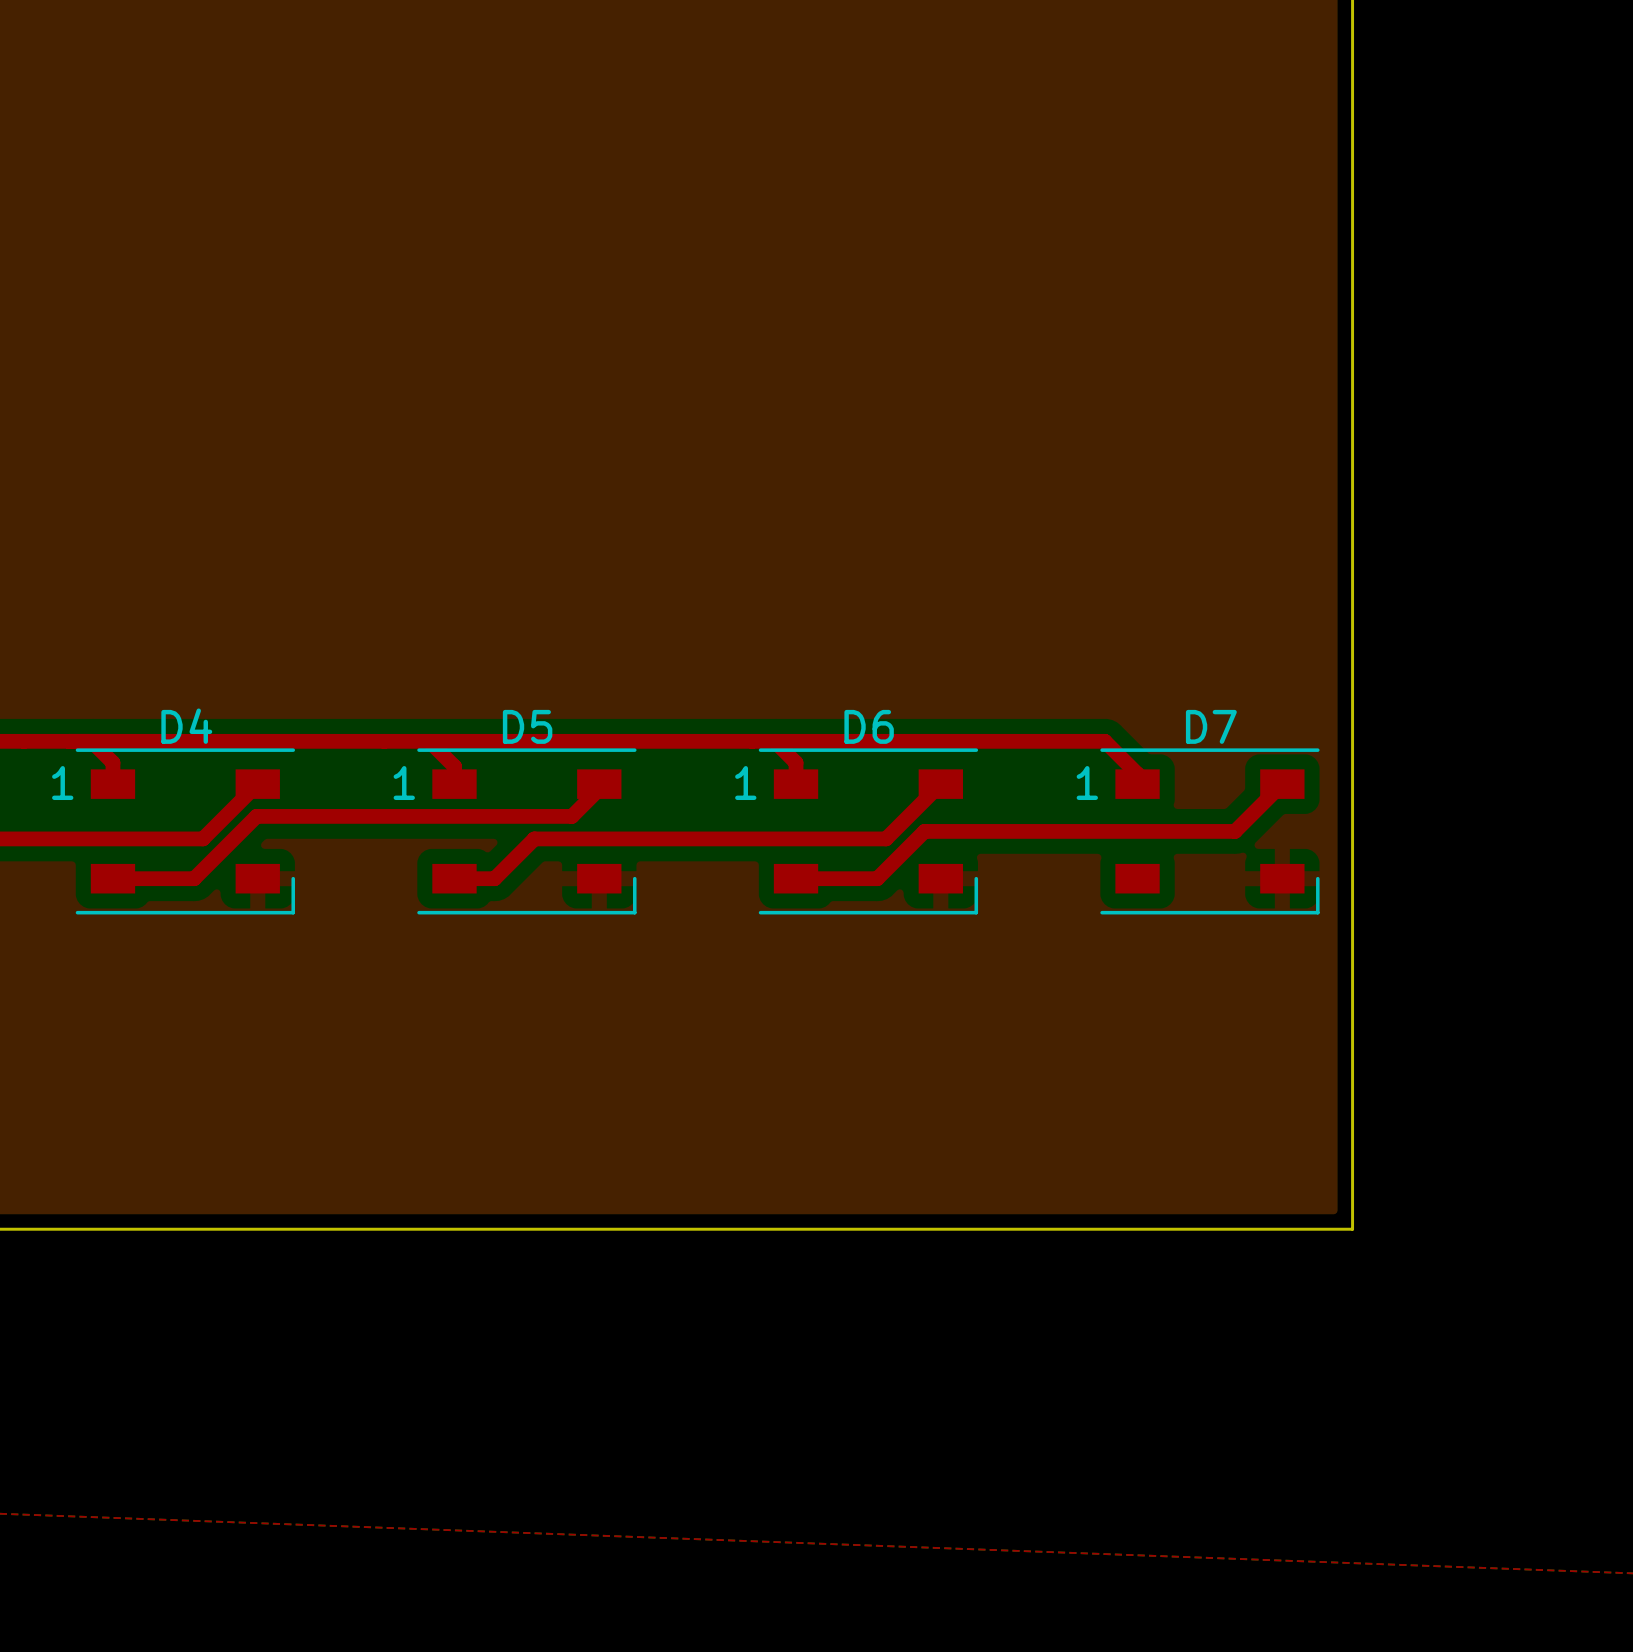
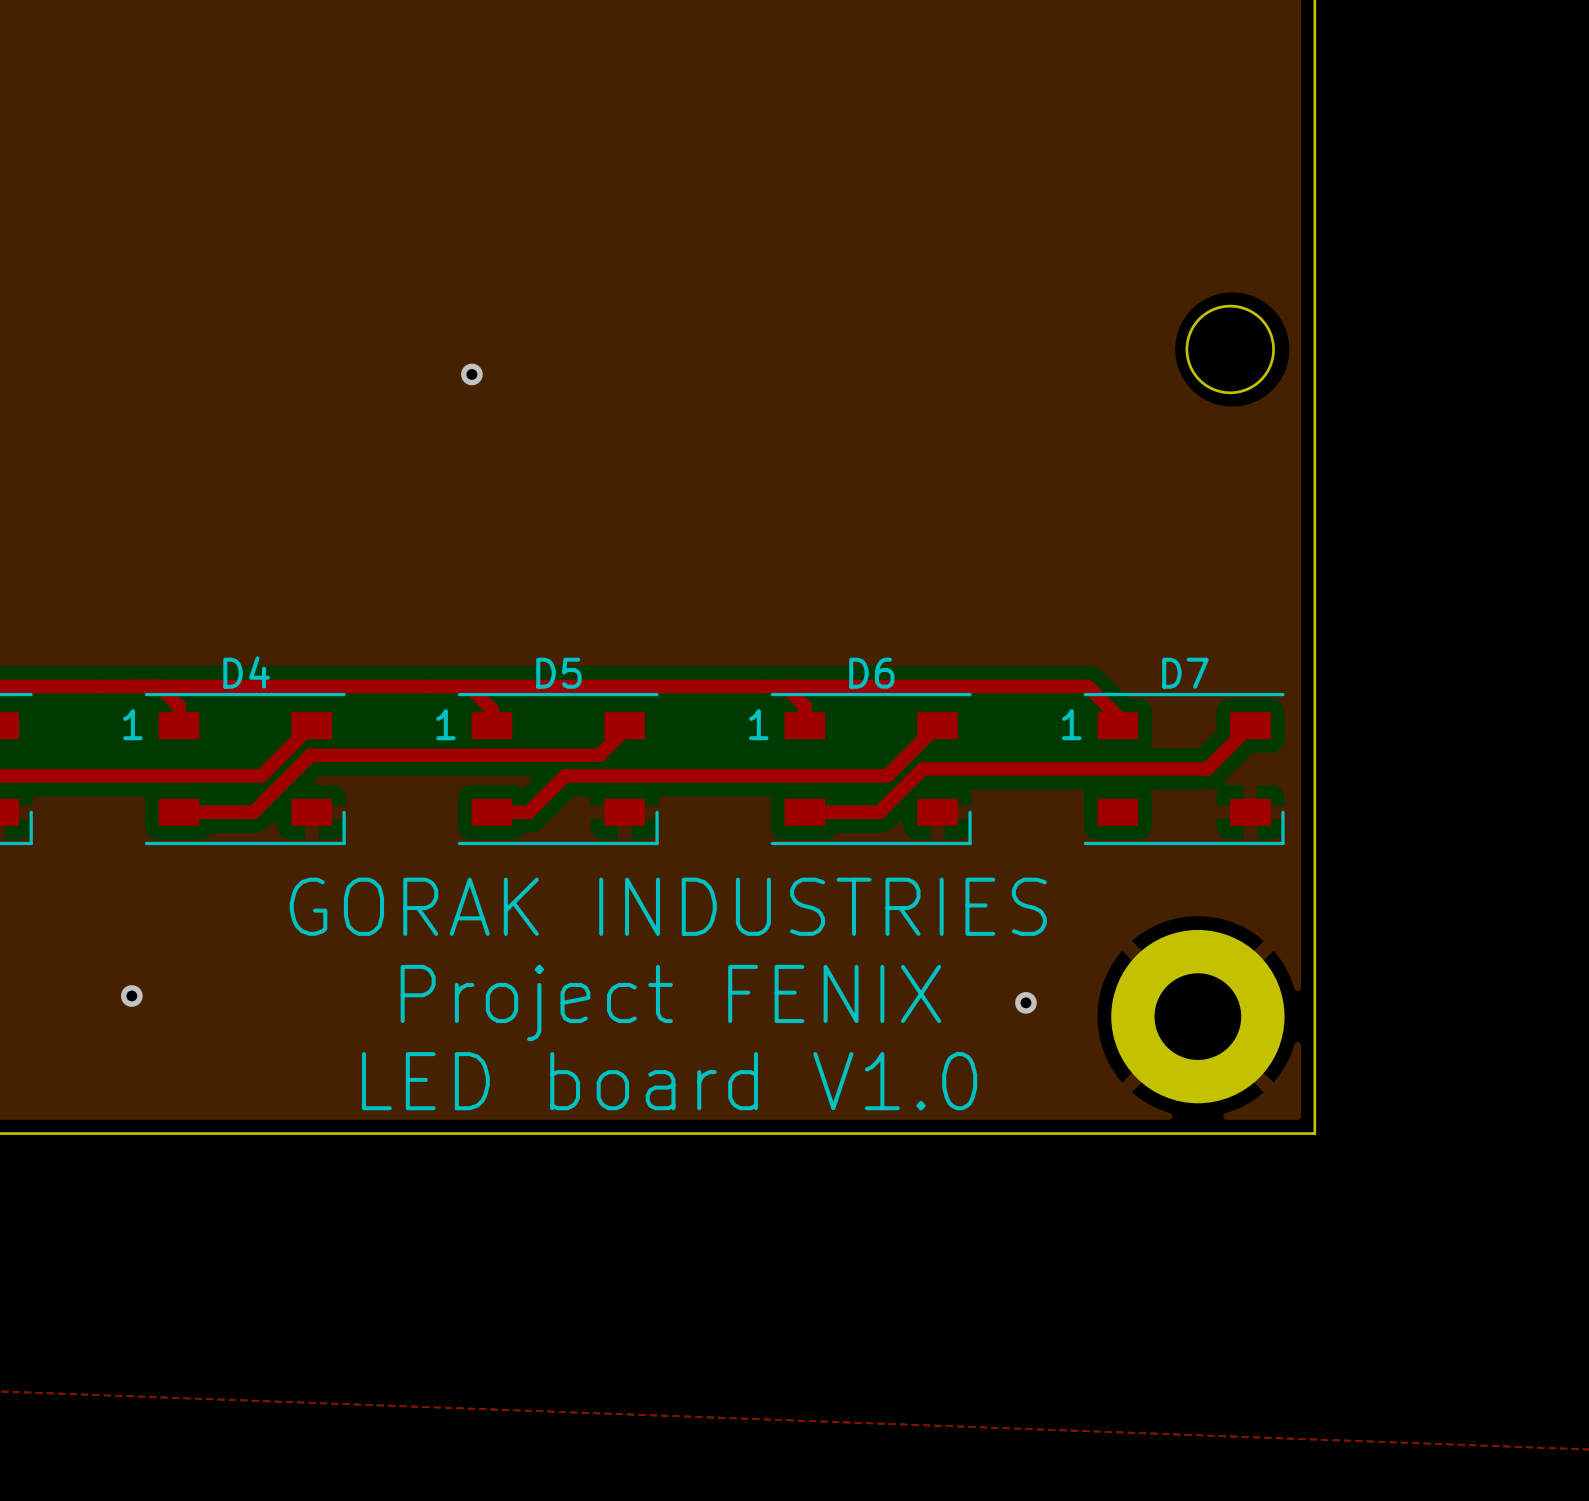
round board edge: none -> [1185, 304, 1275, 395]
via: none -> (471, 374)
text: none -> GORAK INDUSTRIES (668, 906)
via: none -> (131, 995)
text: none -> Project FENIX (670, 1002)
via: none -> (1025, 1002)
part: none -> (1197, 1016)
text: none -> LED board V1.0 (669, 1081)

